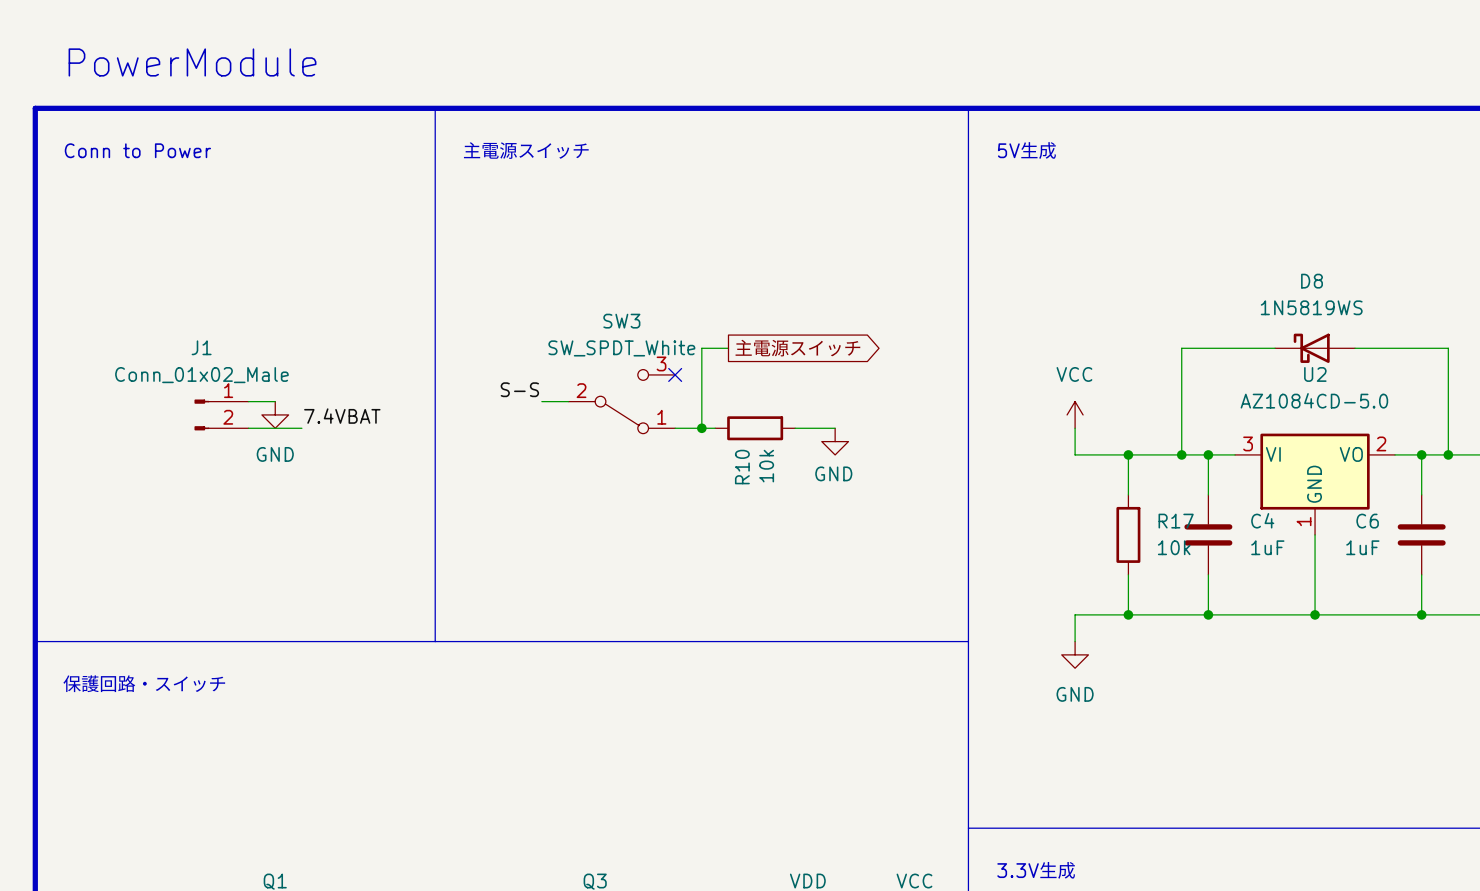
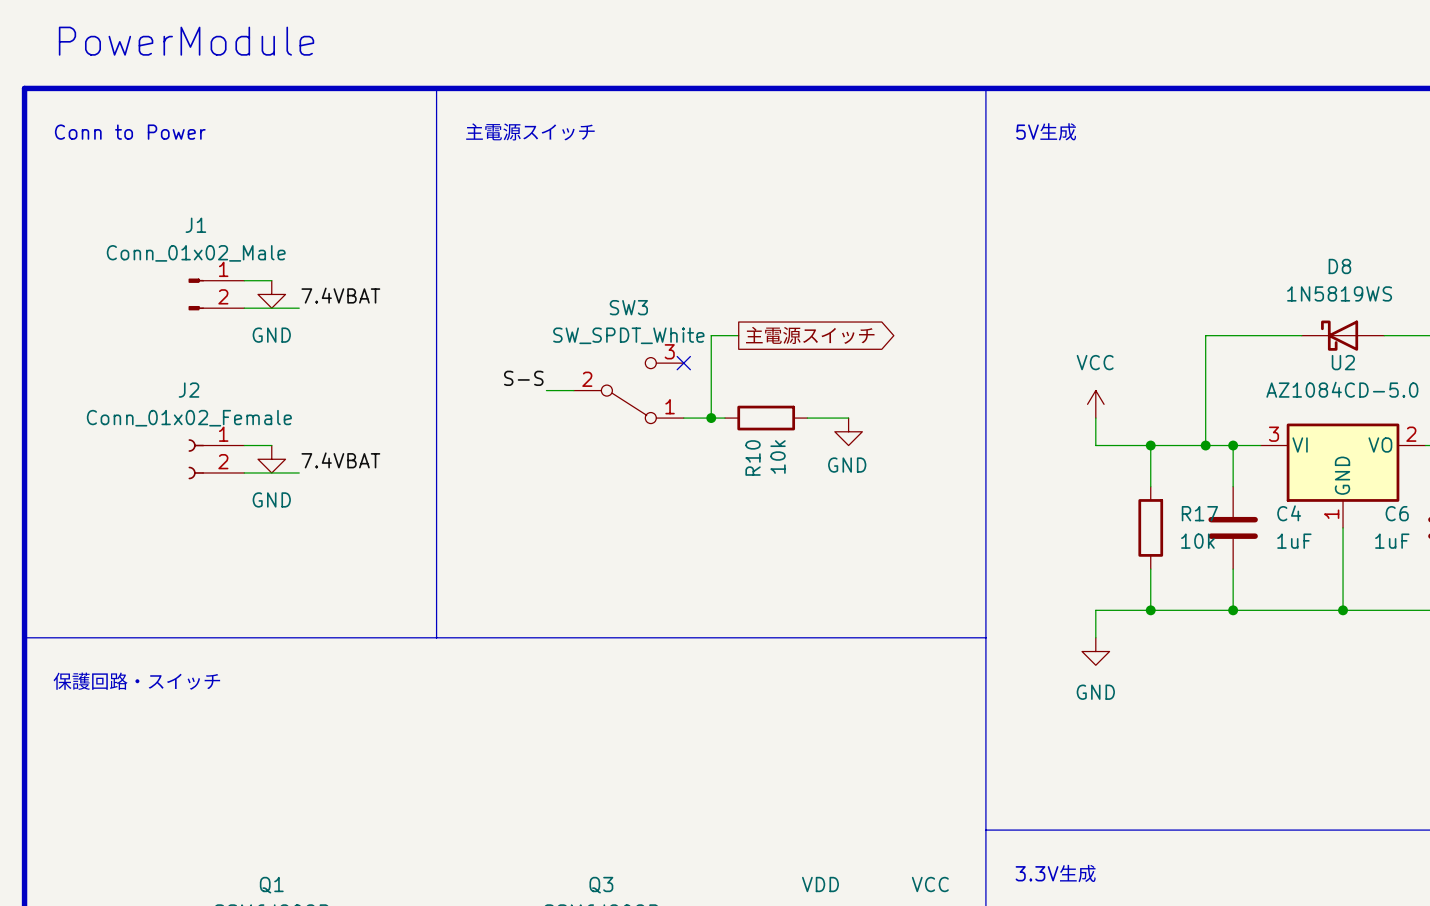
wire: none -> (244, 280) (271, 280)
power symbol: none -> GND (271, 294)
label: none -> 7.4VBAT (340, 295)
wire: none -> (244, 308) (299, 308)
wire: (248, 401) (275, 401) -> (244, 445) (271, 445)
J1 position: (221, 414) -> (216, 294)
power symbol: GND (275, 414) -> none
label: 7.4VBAT (342, 416) -> none
wire: (248, 428) (301, 428) -> (244, 472) (299, 472)
J2: none -> Conn_01x02_Female (216, 459)
power symbol: none -> GND (271, 459)
label: none -> 7.4VBAT (340, 460)

